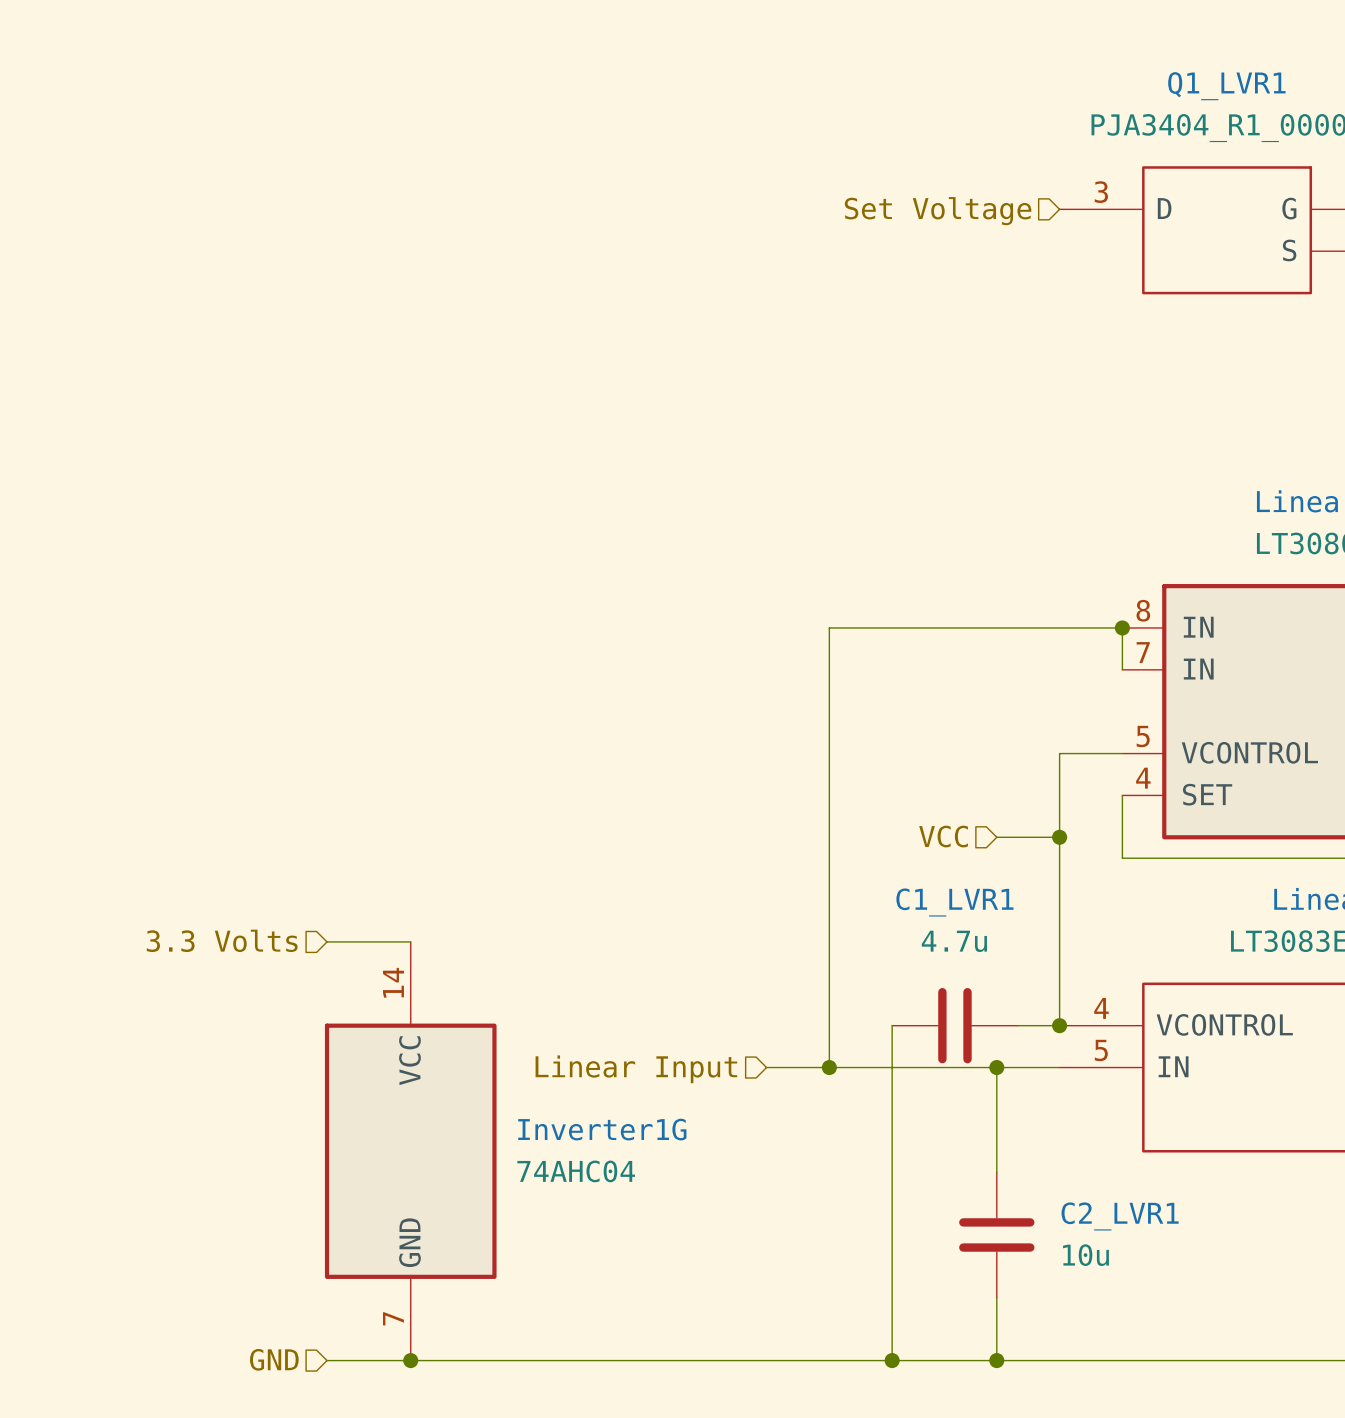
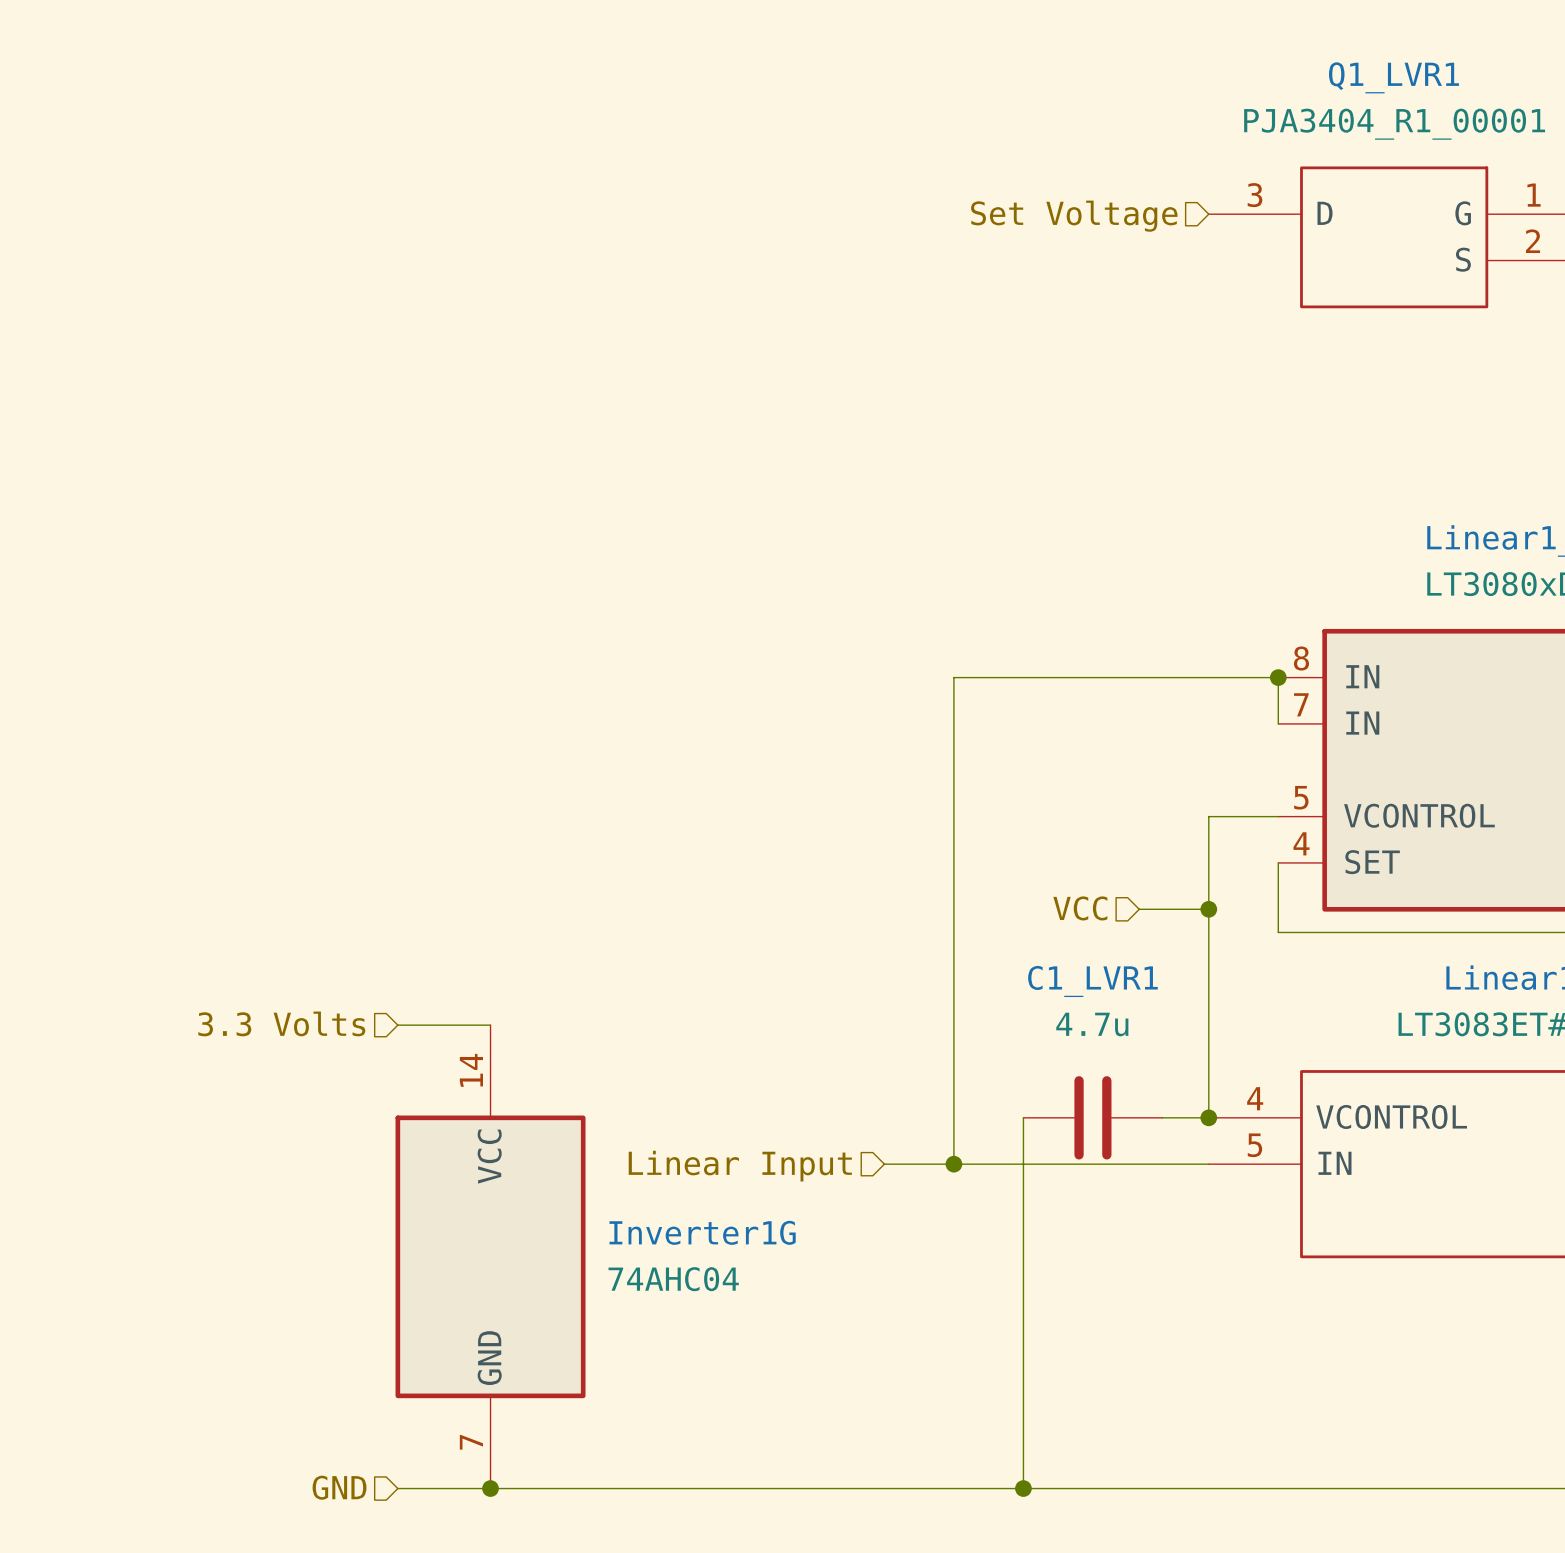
wire: (996, 1067) (996, 1172) -> none
junction: (996, 1067) -> none
C2_LVR1: 10u (996, 1234) -> none
wire: (996, 1297) (996, 1360) -> none
junction: (996, 1360) -> none

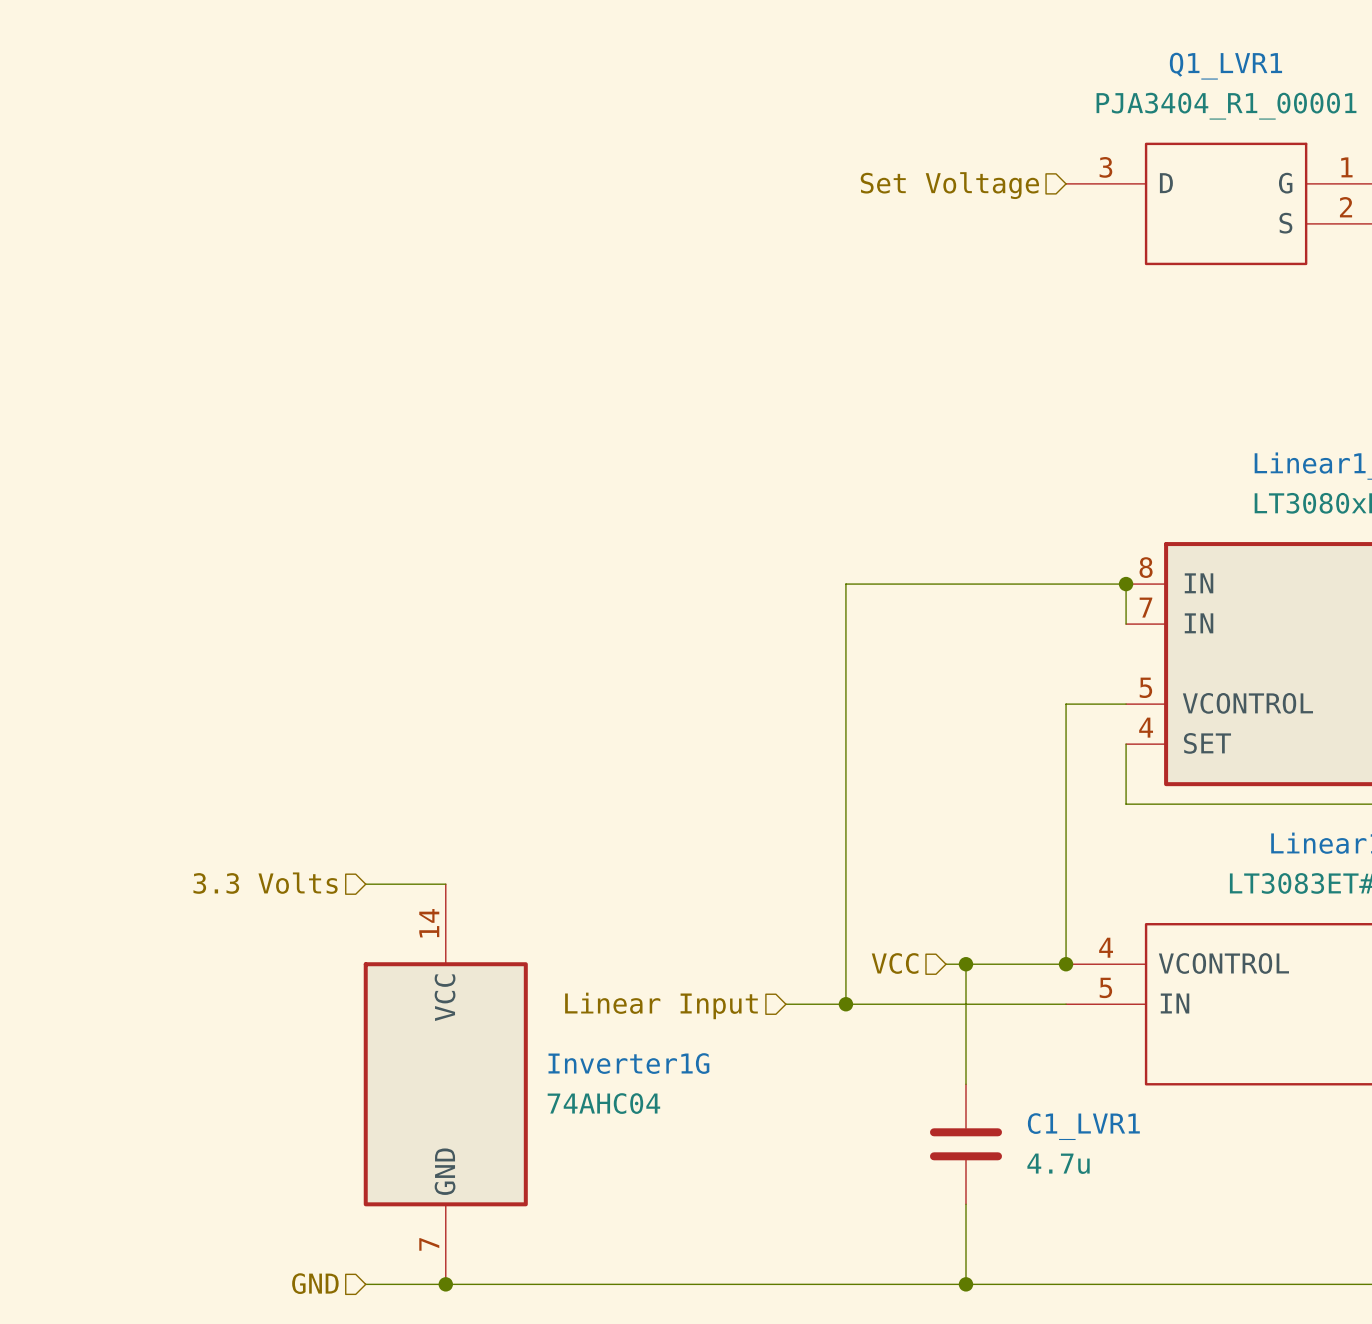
hierarchical label position: VCC (1080, 908) -> VCC (895, 963)
wire: (1139, 909) (1208, 909) -> none
junction: (1208, 909) -> none
wire: (1023, 1117) (1023, 1488) -> none
wire: none -> (966, 964) (966, 1084)
junction: none -> (966, 964)
C1_LVR1 rotation: 0° (1092, 1117) -> 90° clockwise (966, 1144)
C1_LVR1 position: (1092, 1117) -> (966, 1144)
wire: none -> (966, 1204) (966, 1284)
junction position: (1023, 1488) -> (966, 1284)

